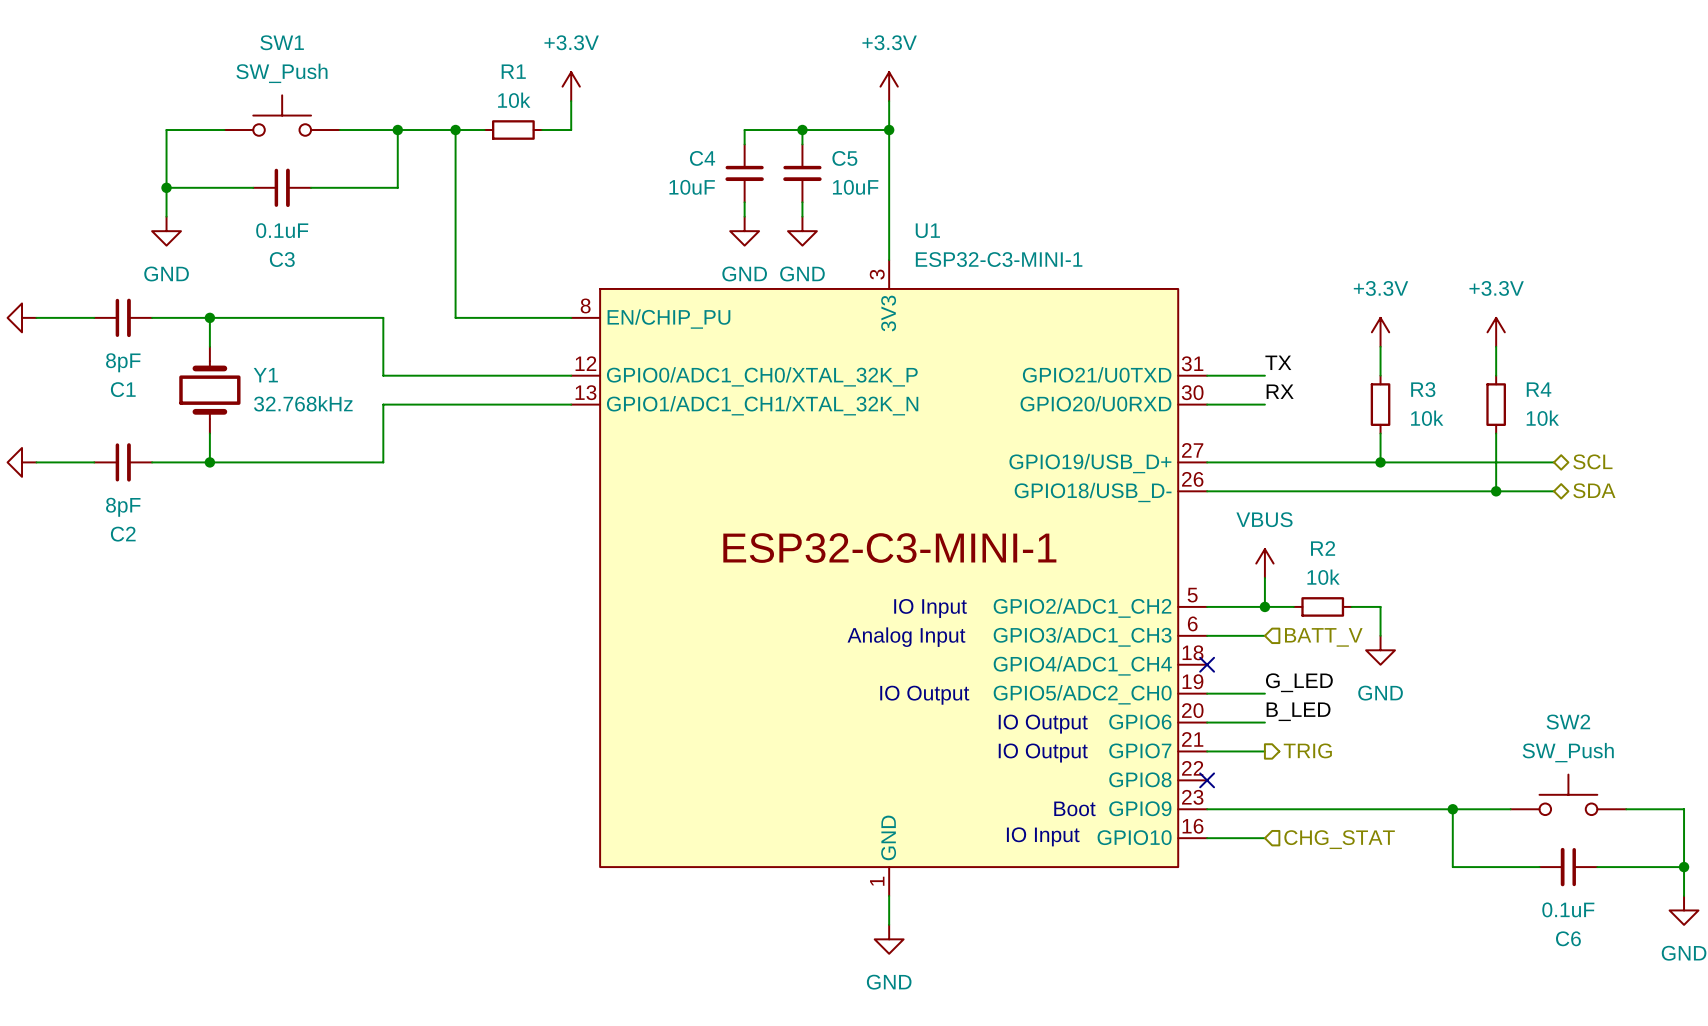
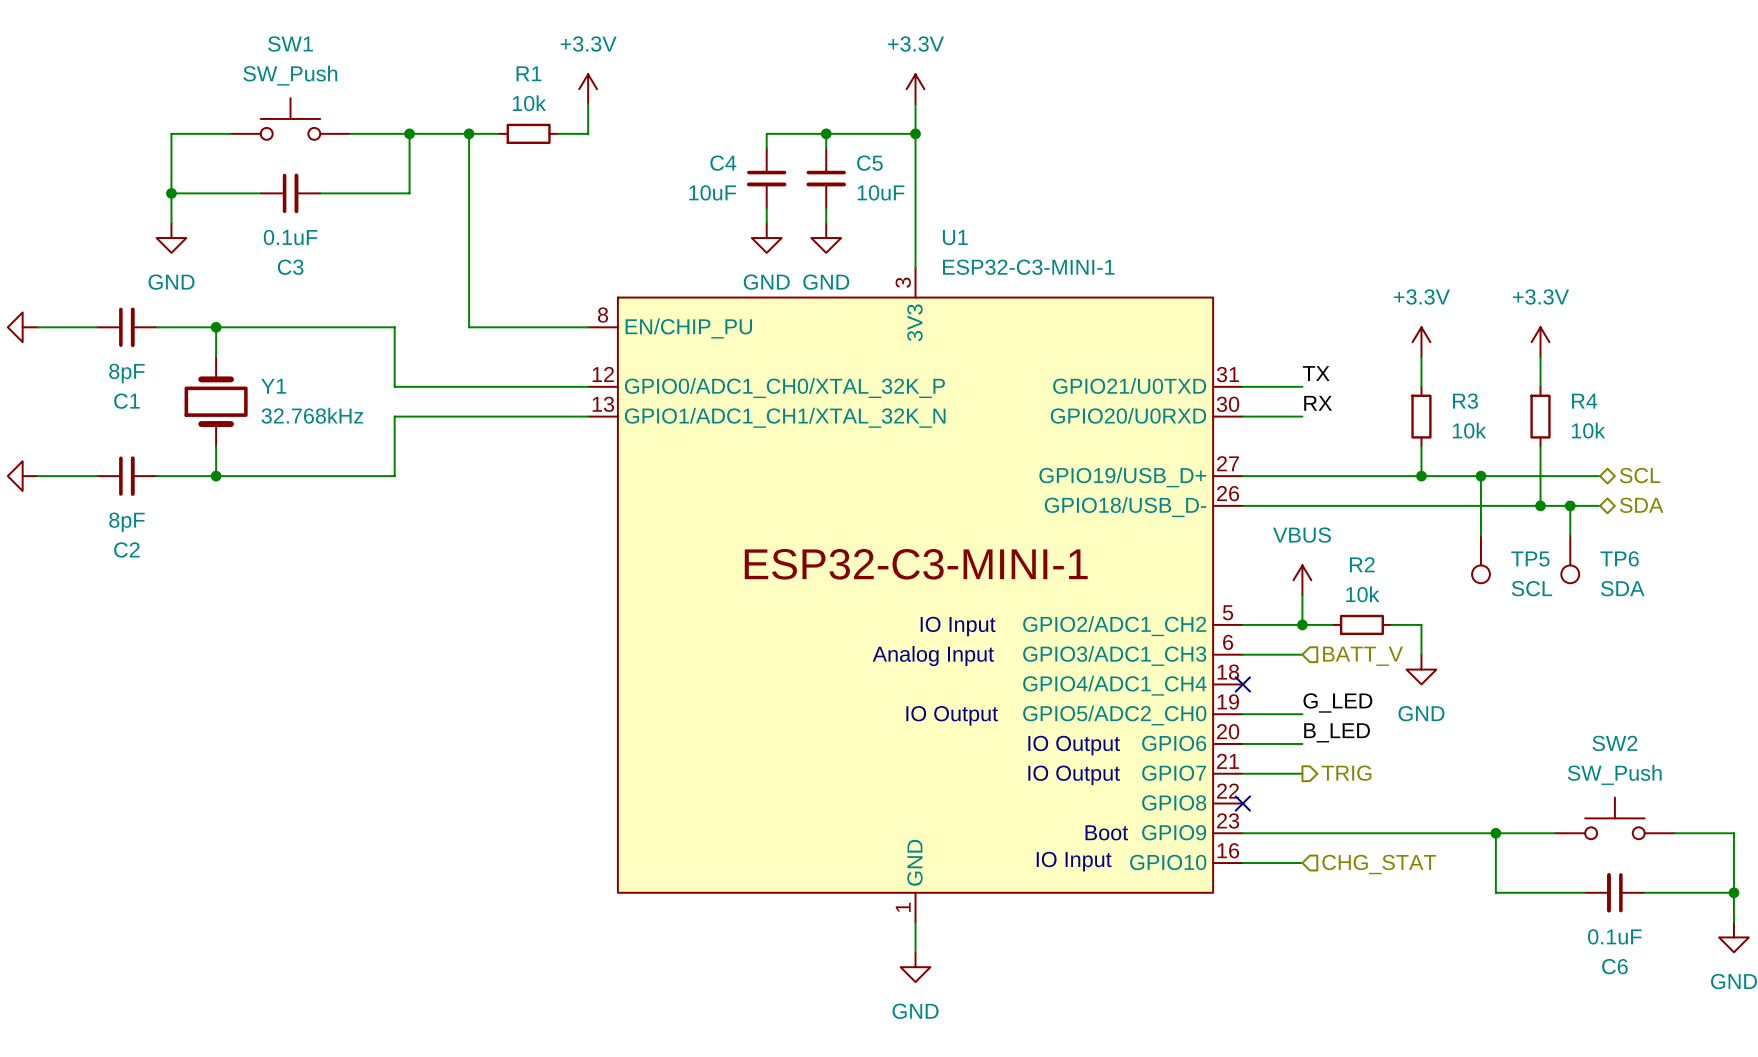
wire: none -> (1480, 476) (1480, 535)
junction: none -> (1480, 476)
wire: none -> (1570, 505) (1570, 535)
junction: none -> (1570, 505)
TP5: none -> SCL (1480, 559)
TP6: none -> SDA (1570, 559)

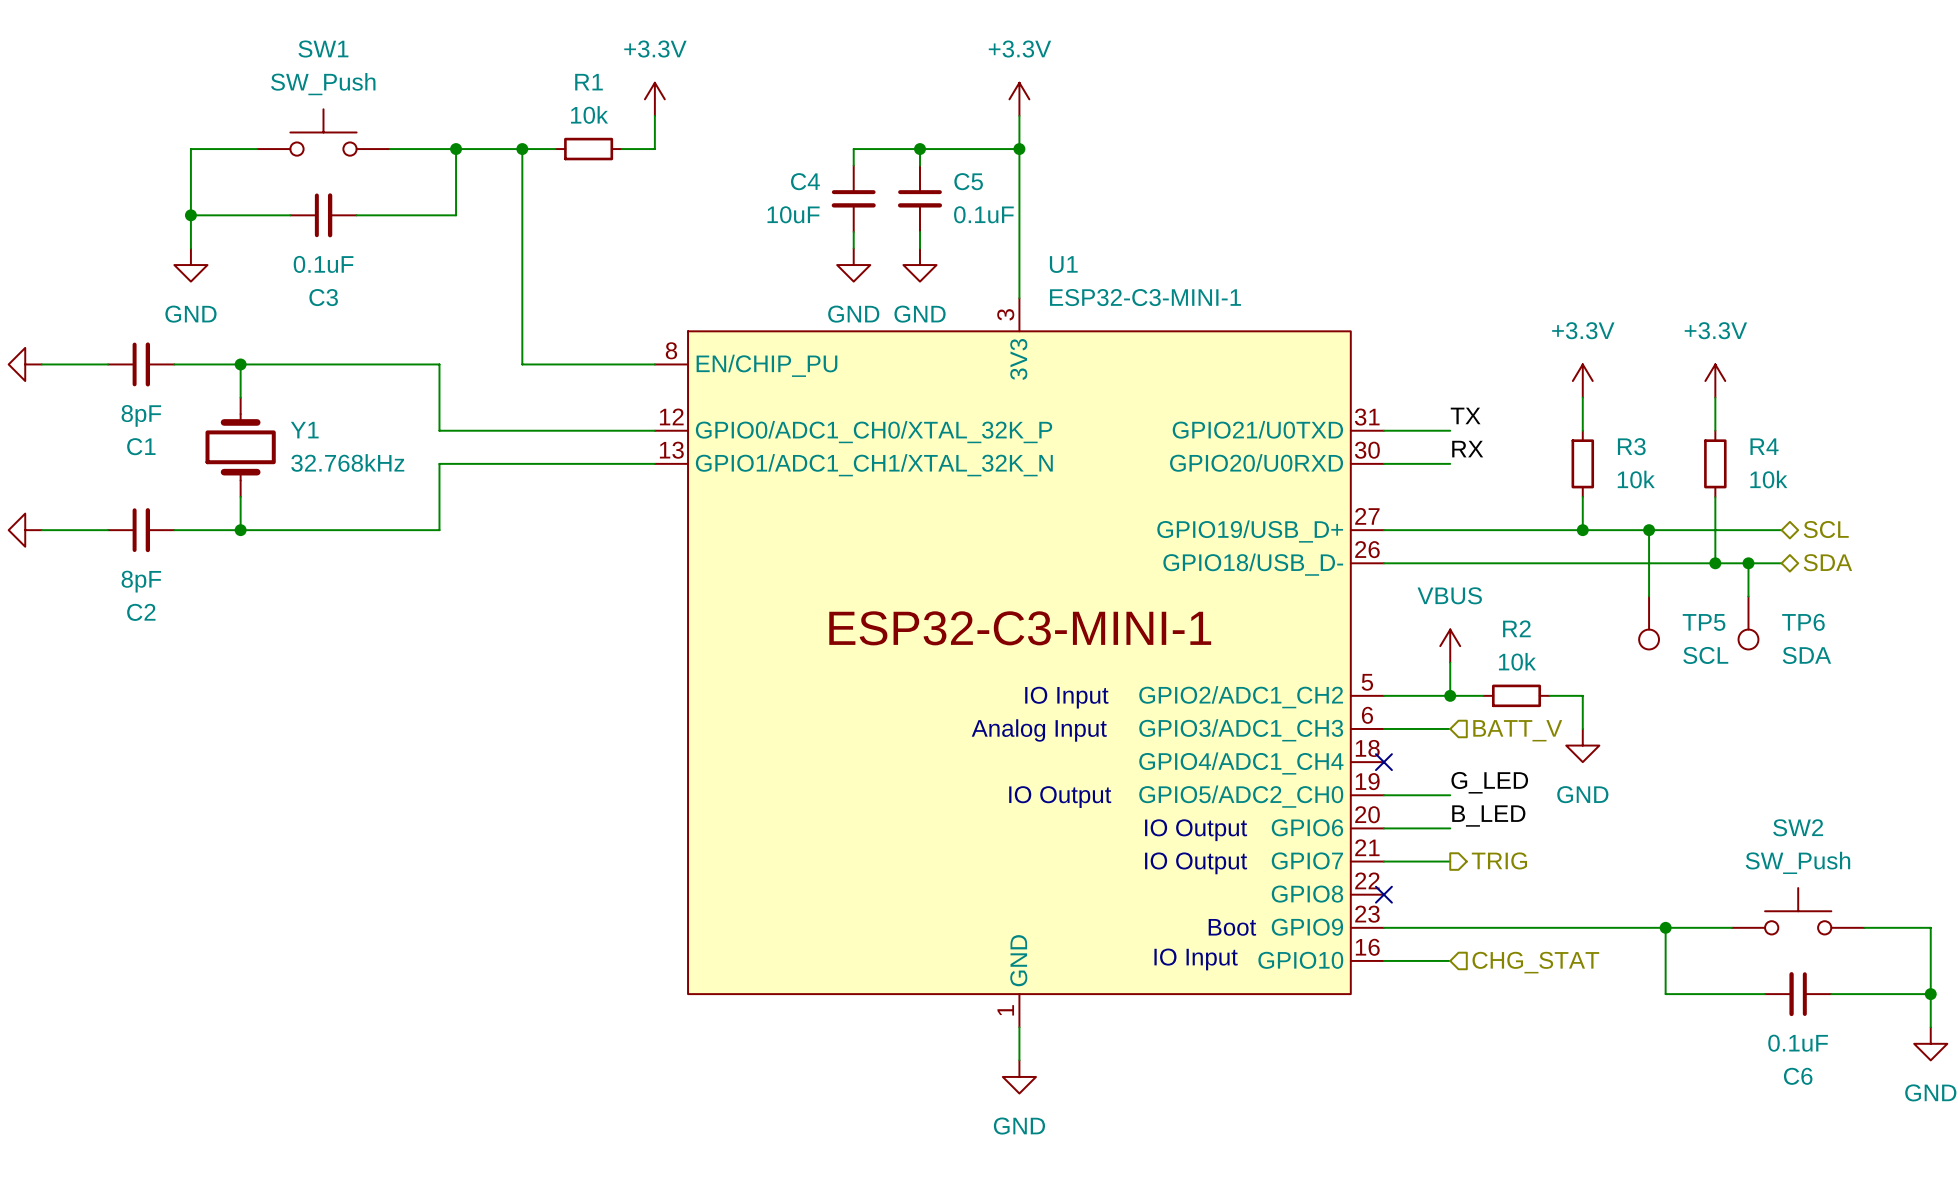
C5 value: 10uF (881, 192) -> 0.1uF (983, 214)

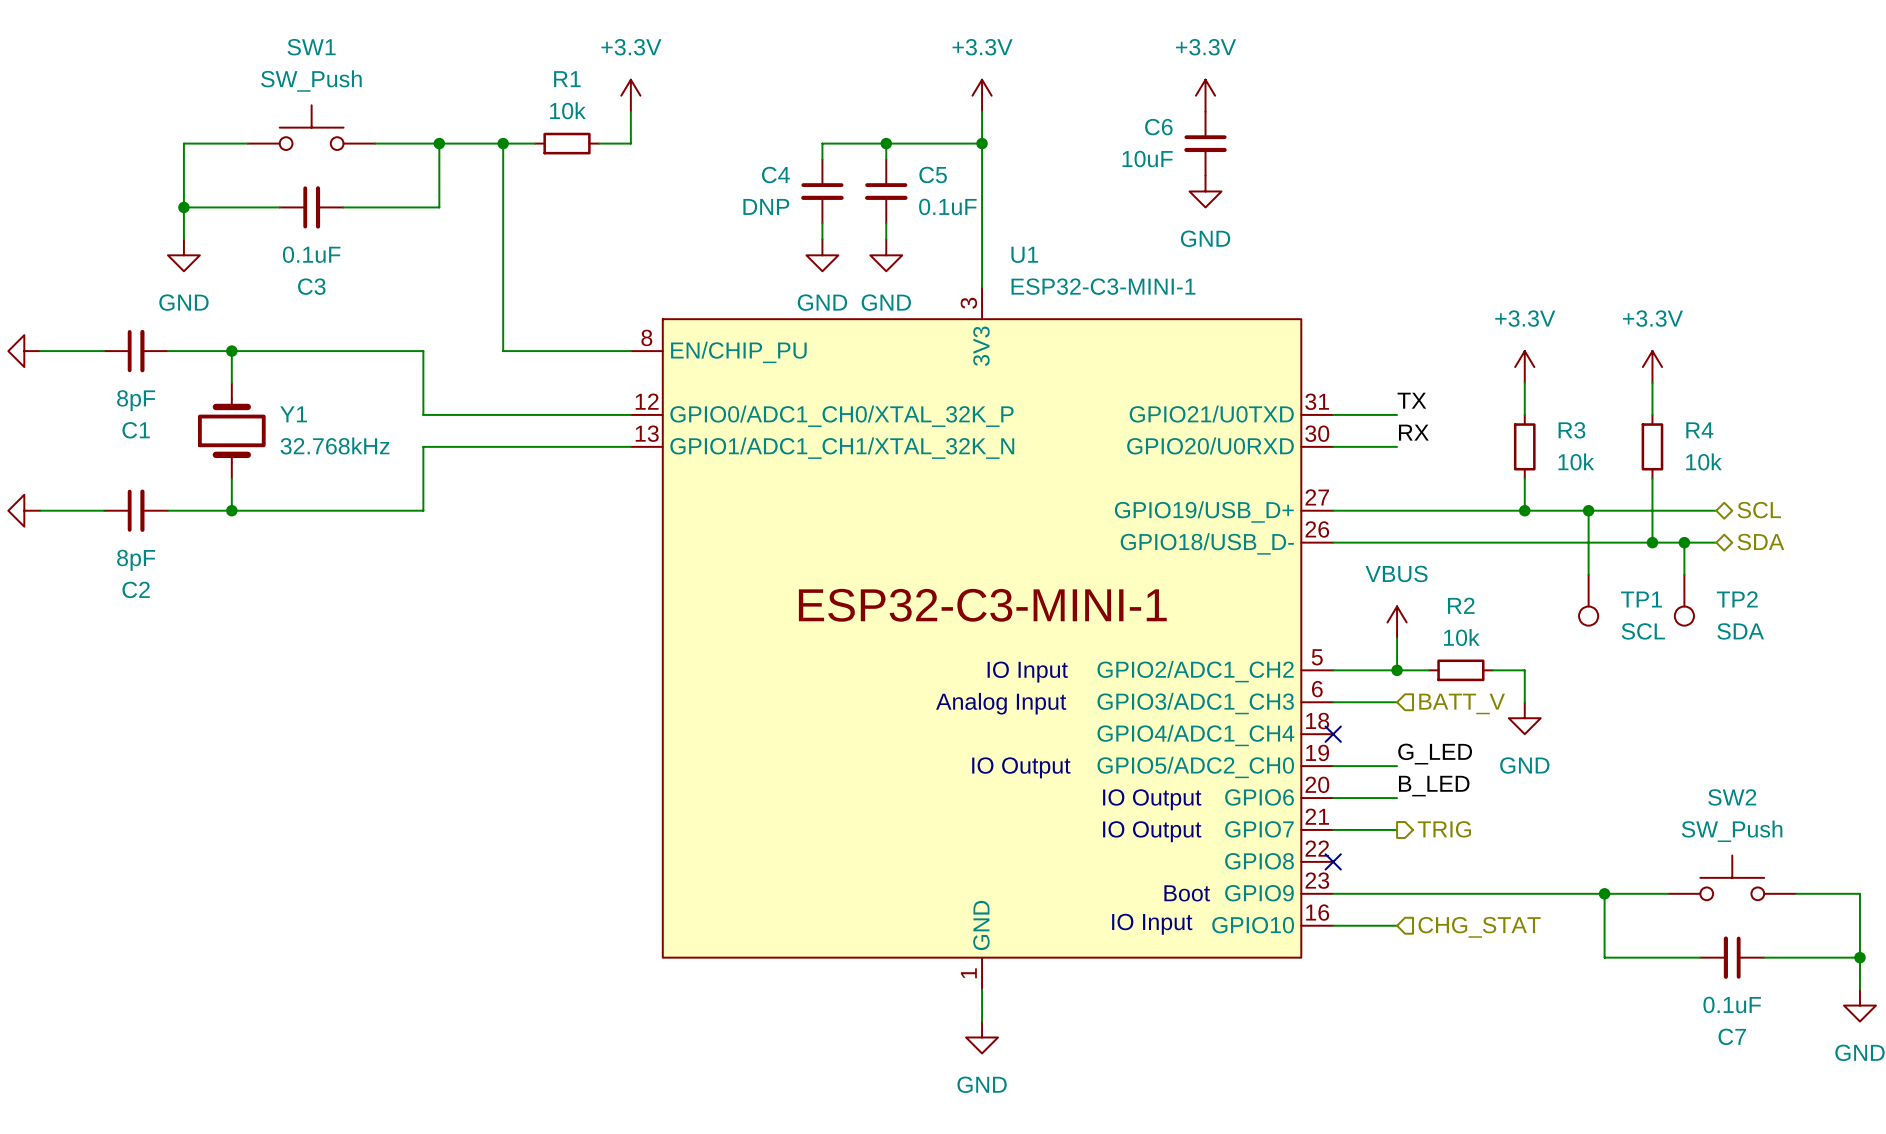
power symbol: none -> +3.3V (1205, 95)
C6: none -> 10uF (1205, 143)
power symbol: none -> GND (1205, 191)
C4 value: 10uF (793, 214) -> DNP (766, 206)
TP5 name: TP5 (1704, 622) -> TP1 (1641, 599)
TP6 name: TP6 (1803, 622) -> TP2 (1737, 599)
C6 name: C6 (1798, 1076) -> C7 (1732, 1036)

